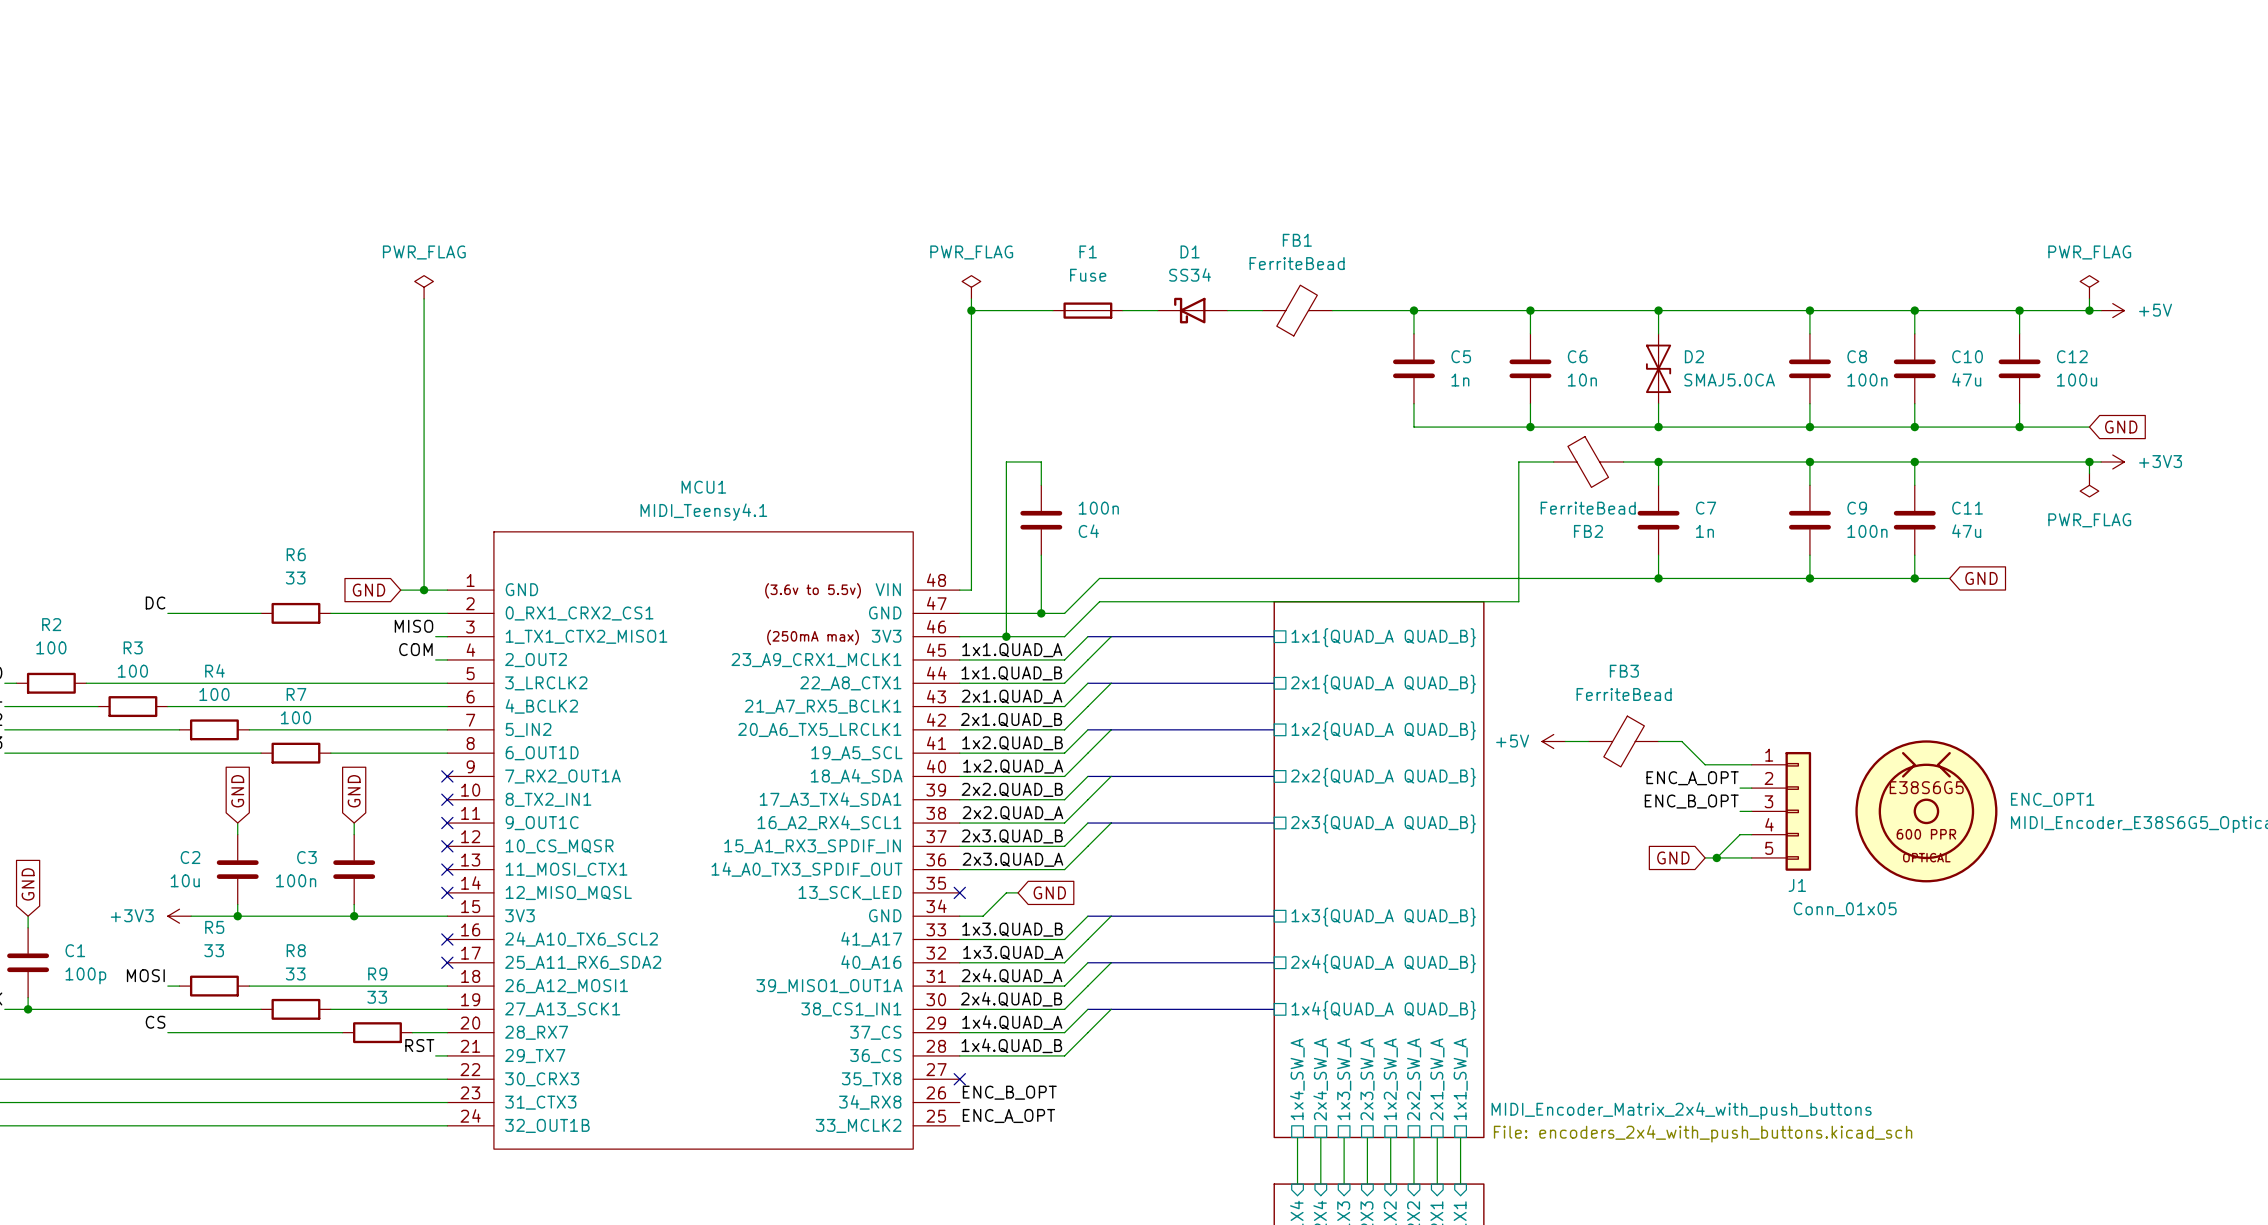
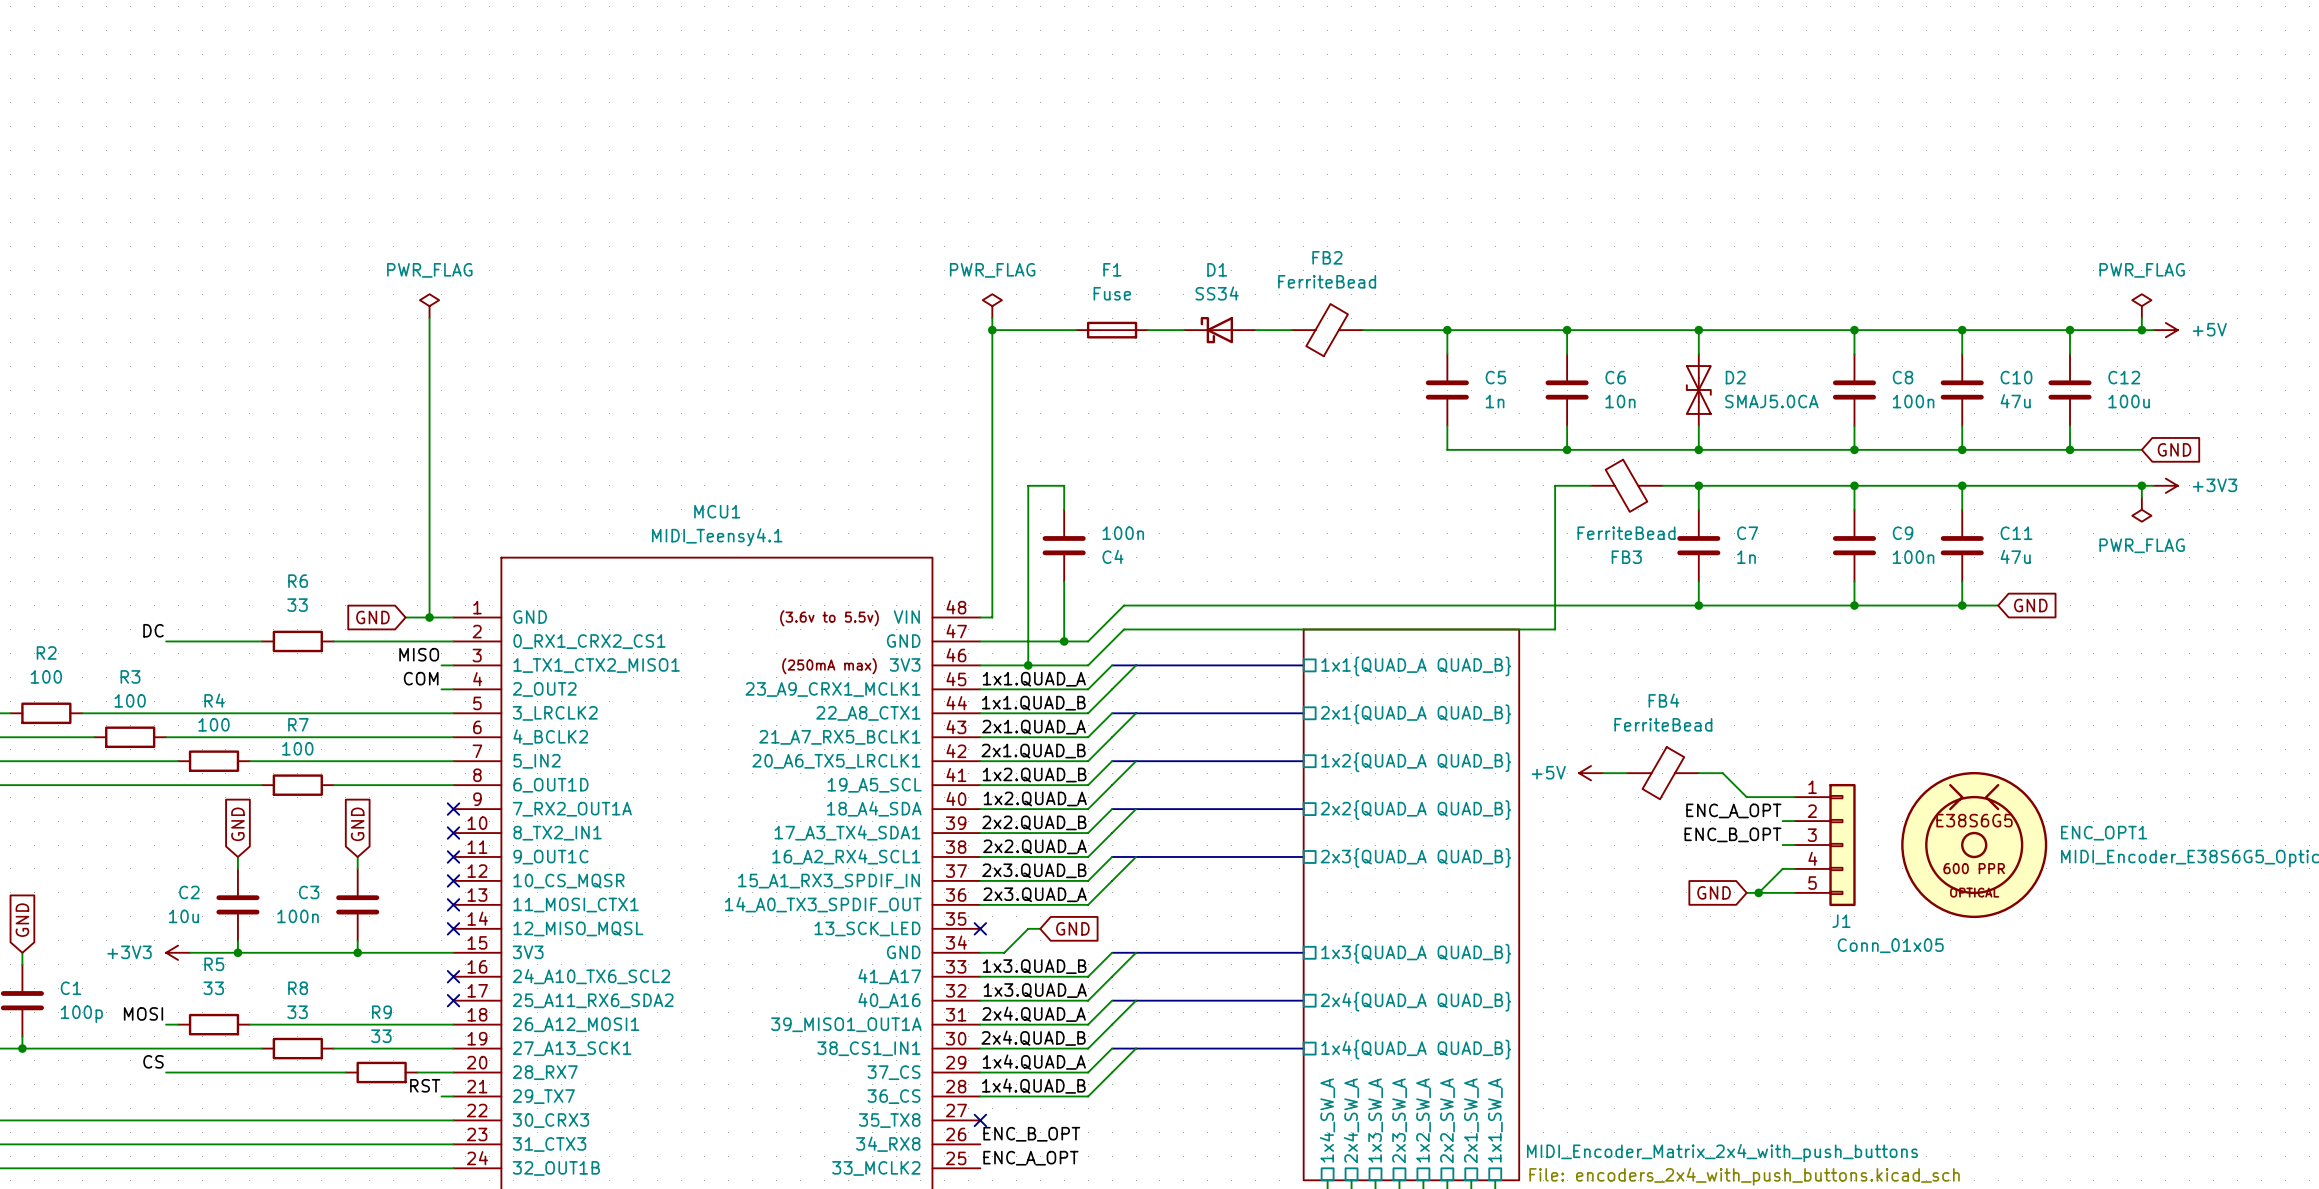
FB1 name: FB1 (1297, 240) -> FB2 (1327, 257)
FB2 name: FB2 (1588, 531) -> FB3 (1626, 557)
FB3 name: FB3 (1624, 671) -> FB4 (1663, 700)

